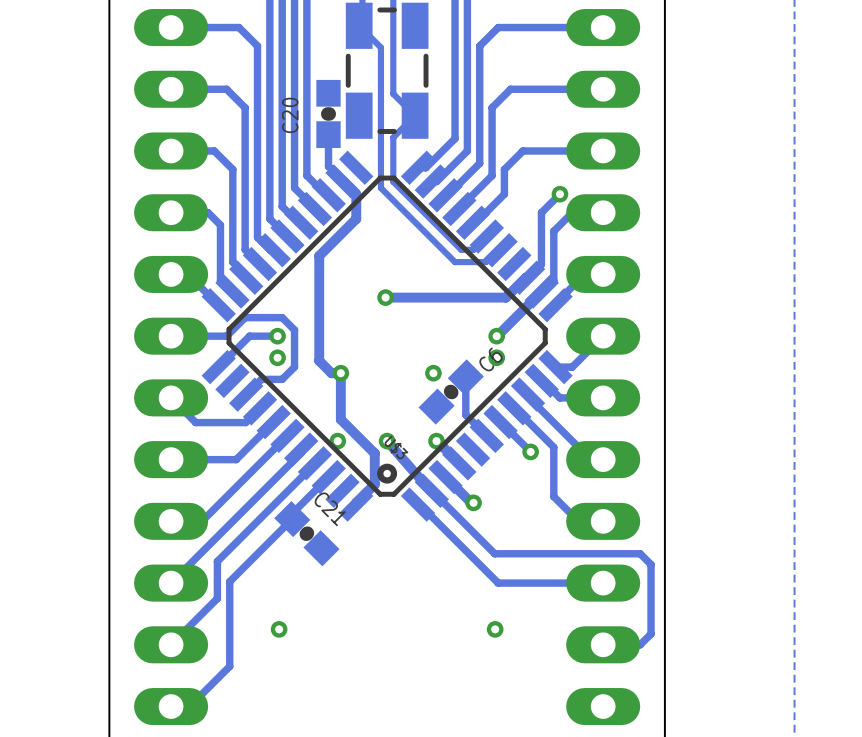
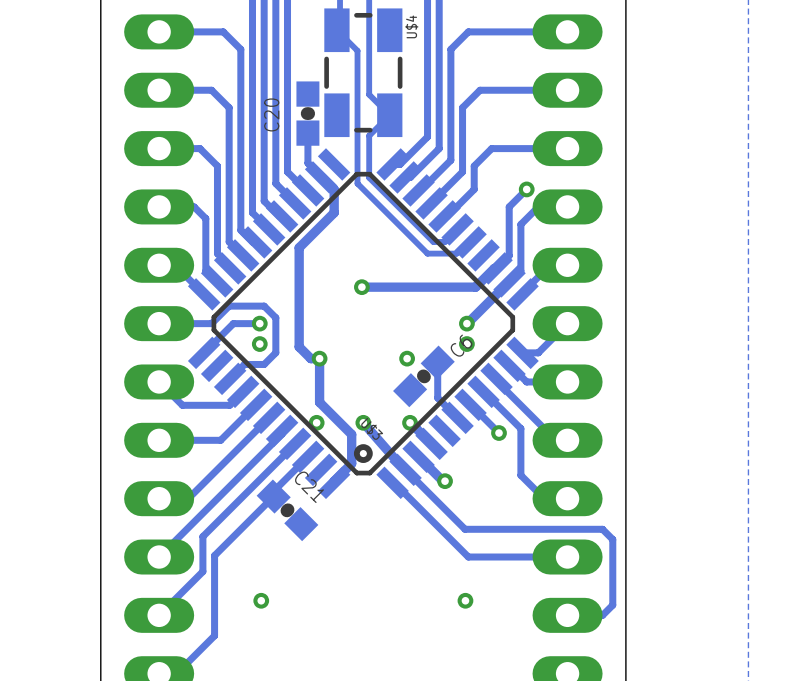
U$4 name: none -> U$4 (411, 26)

